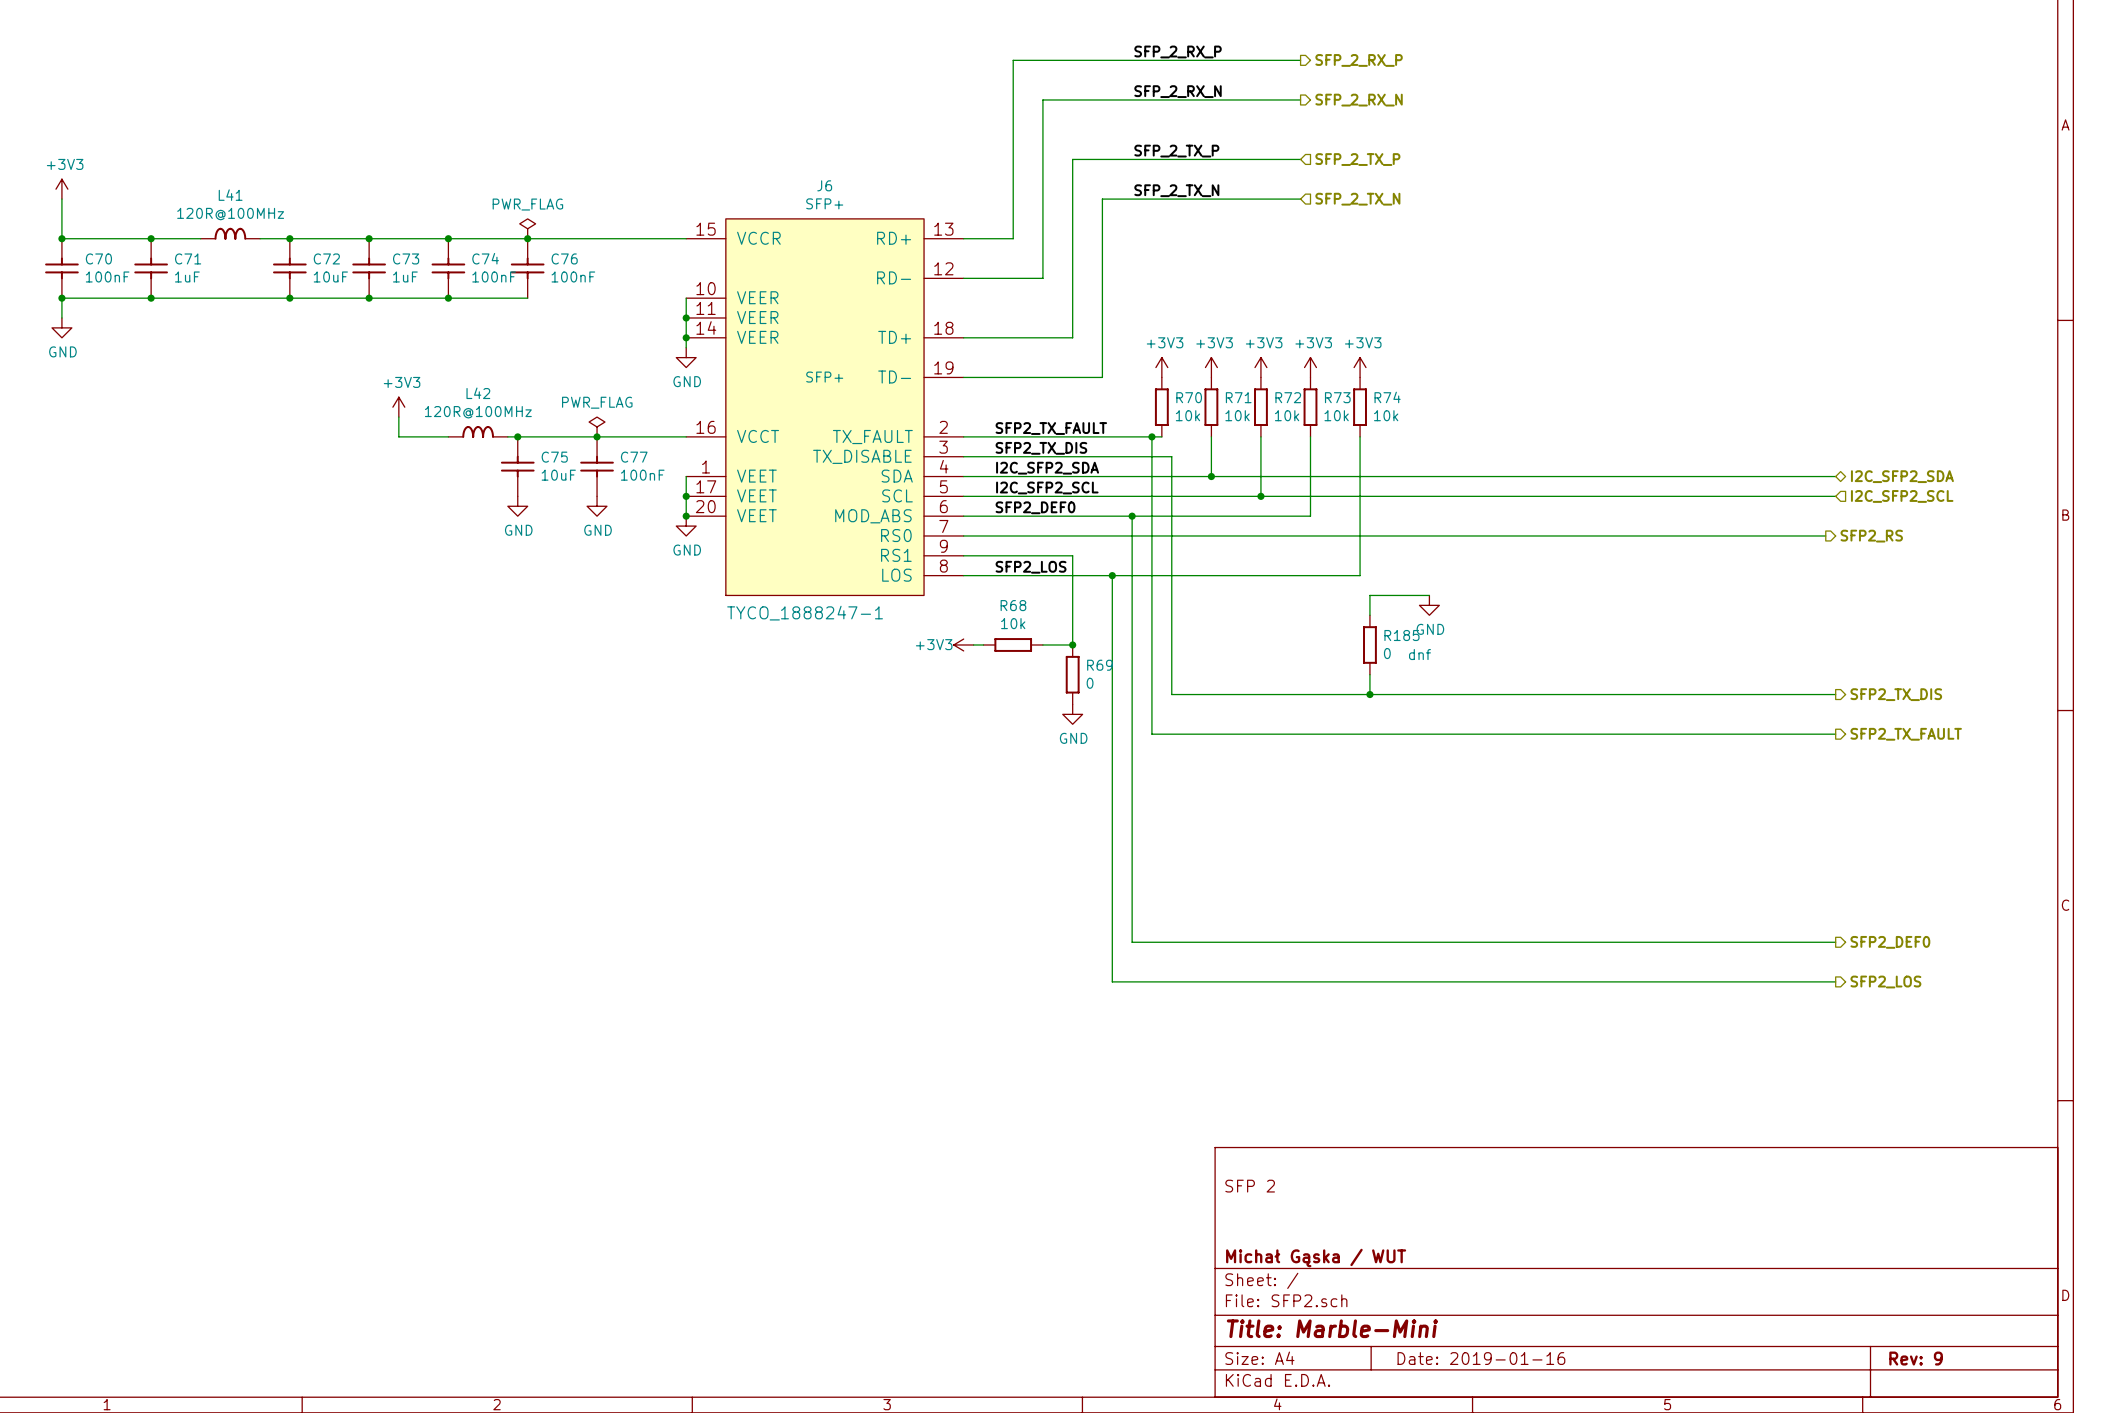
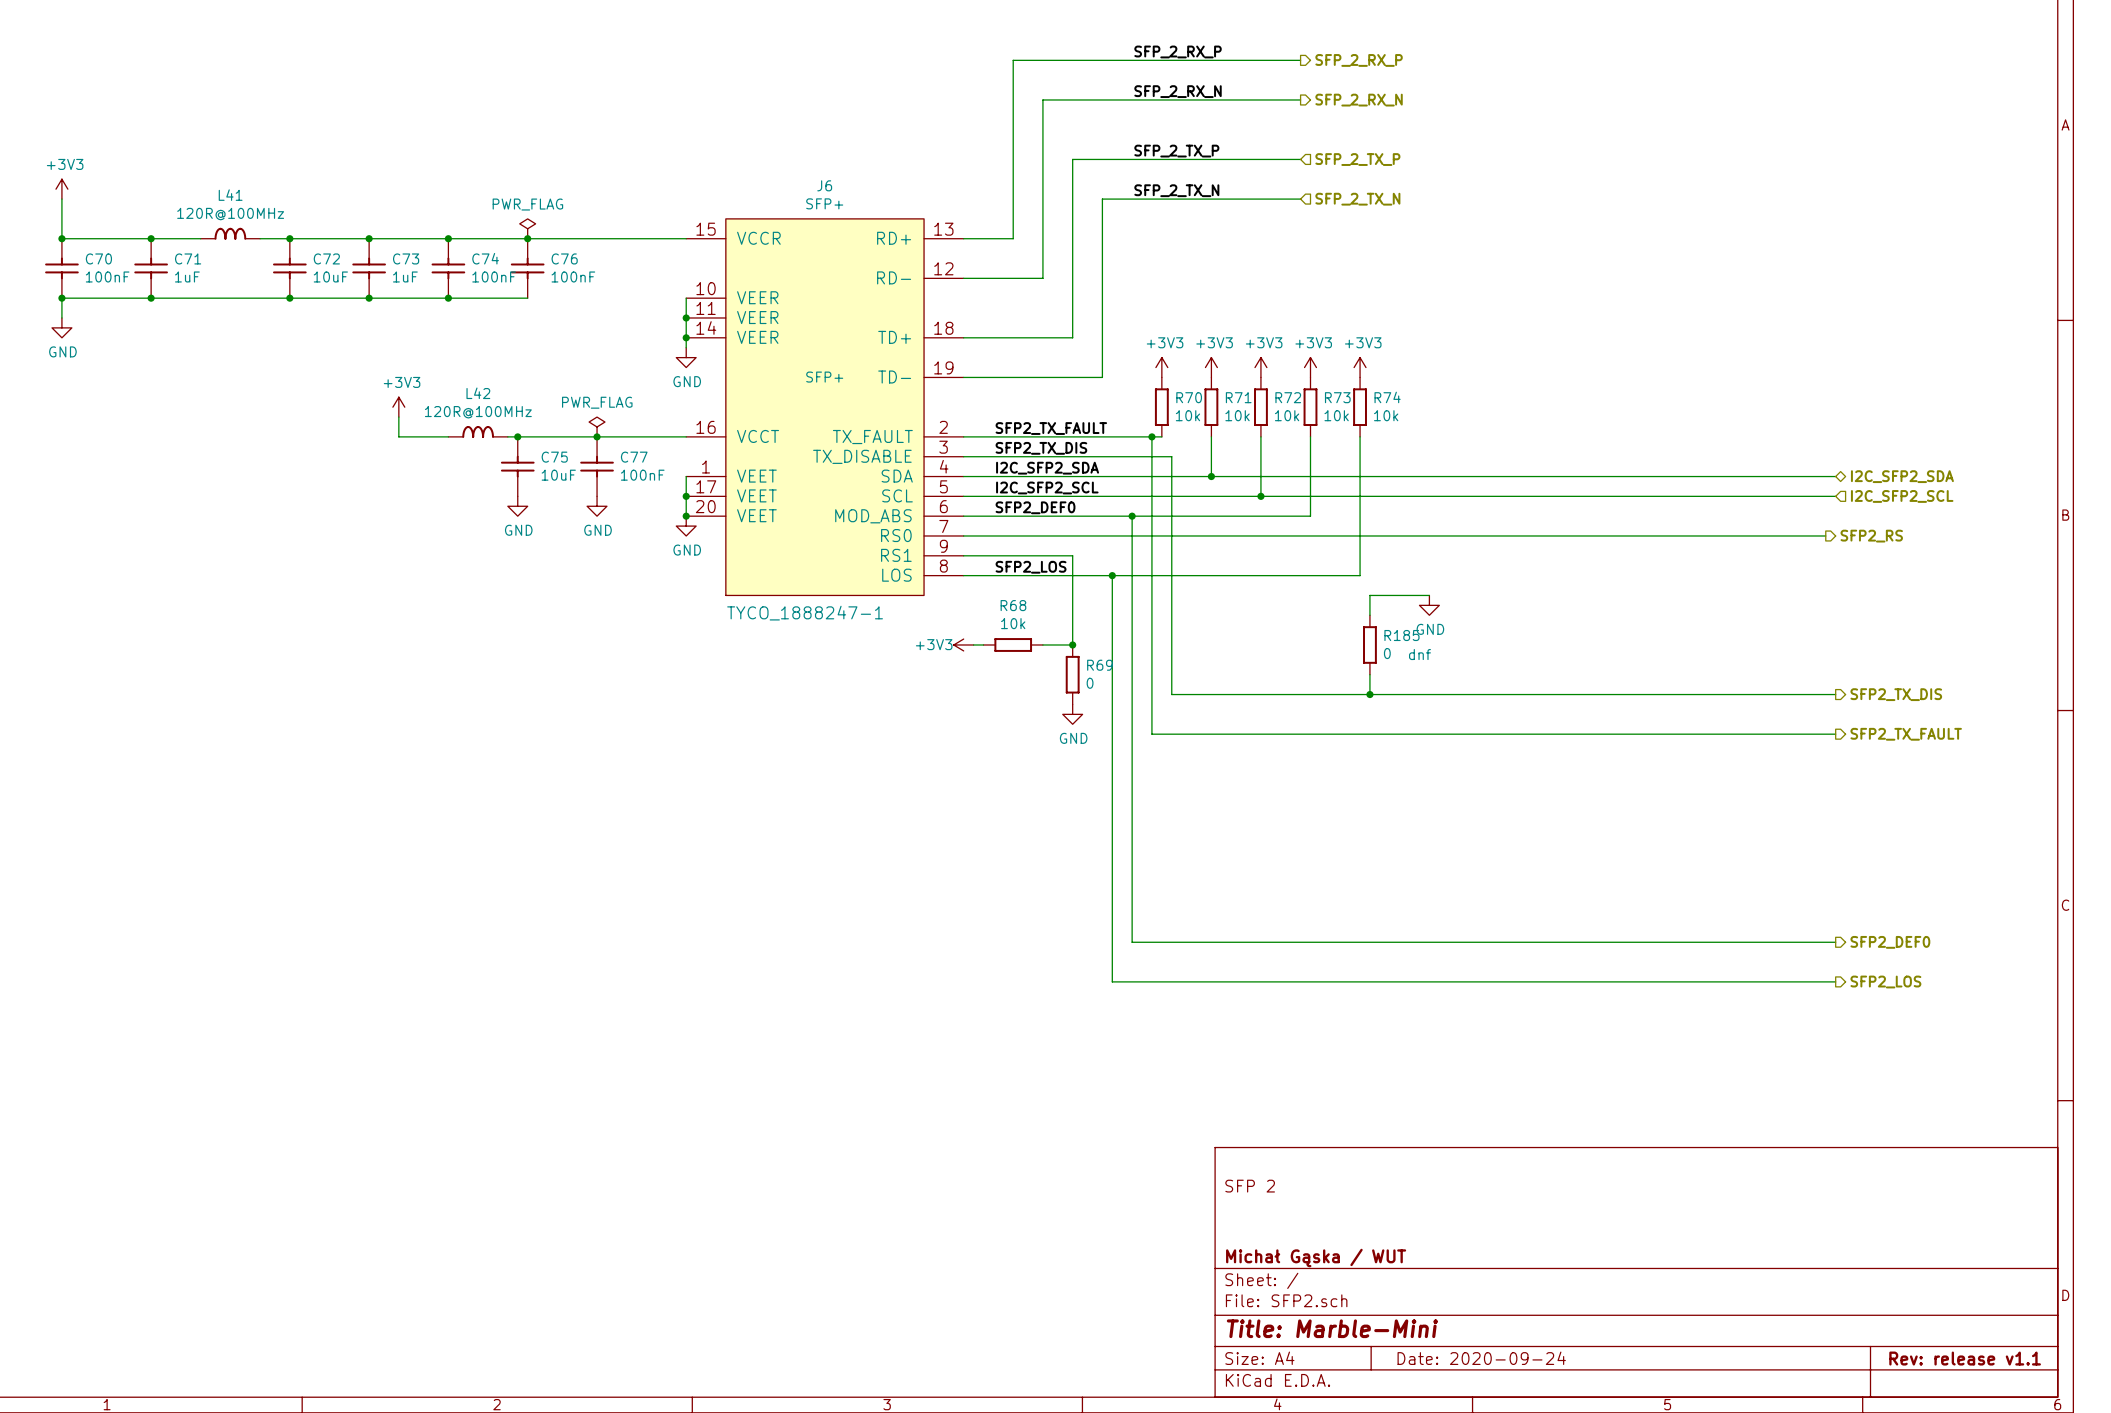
title block: Date: 2019-01-16 (1481, 1358) -> Date: 2020-09-24 (1481, 1358)
title block: Rev: 9 (1916, 1358) -> Rev: release v1.1 (1965, 1358)

